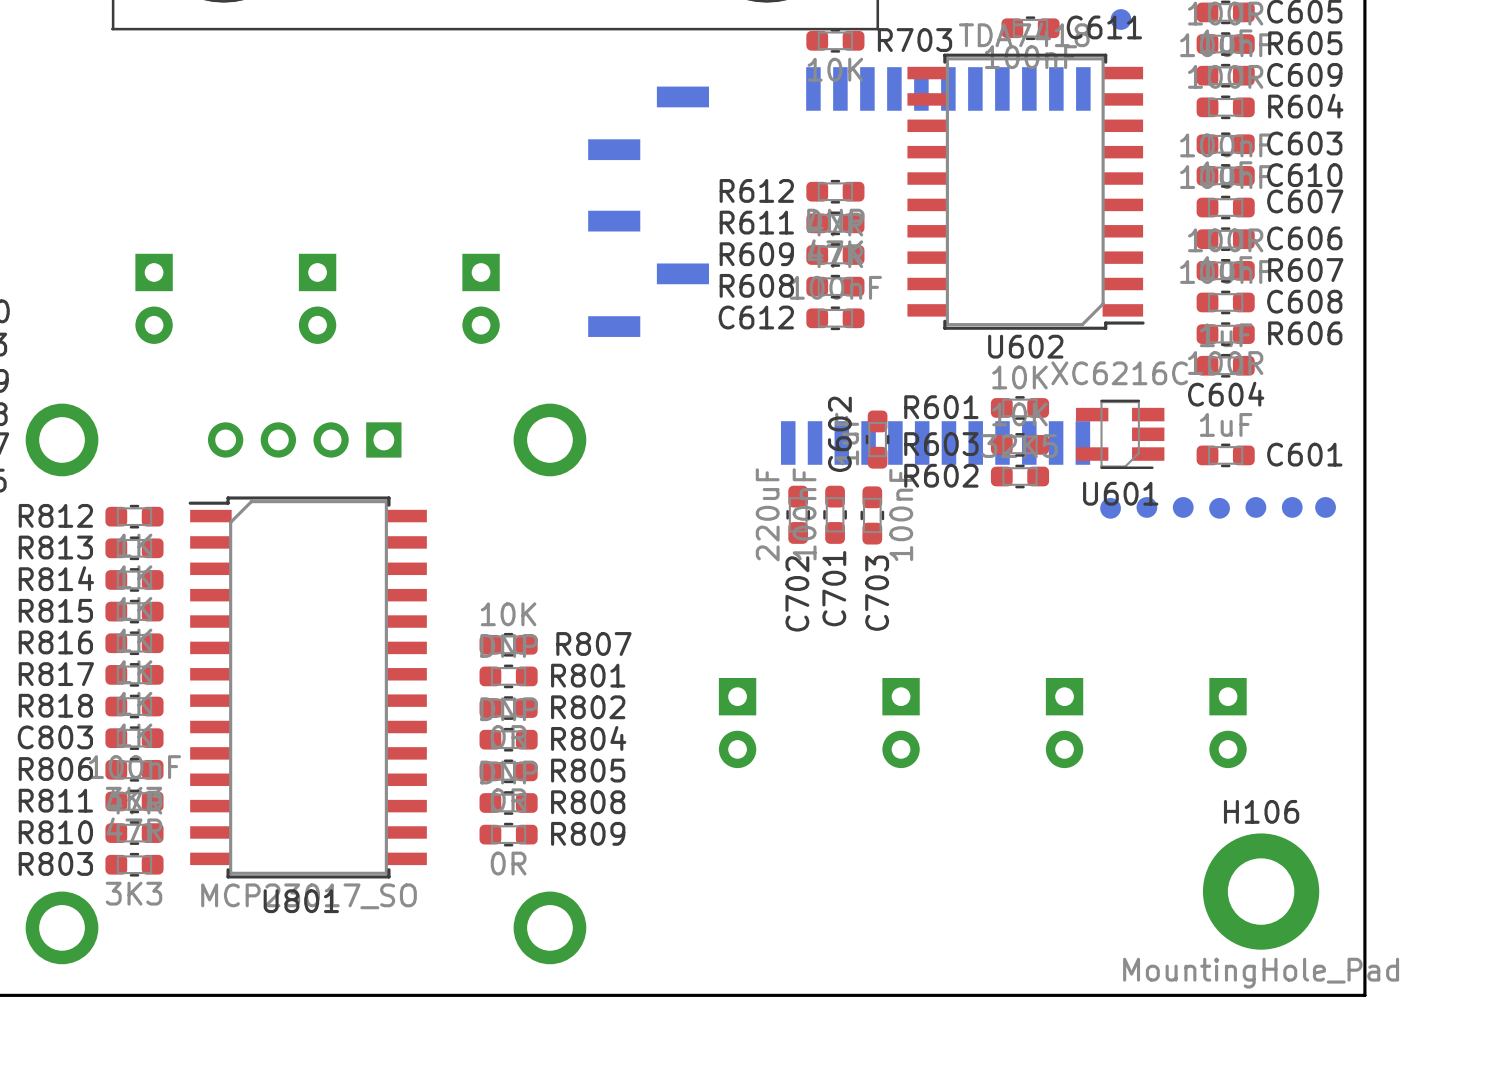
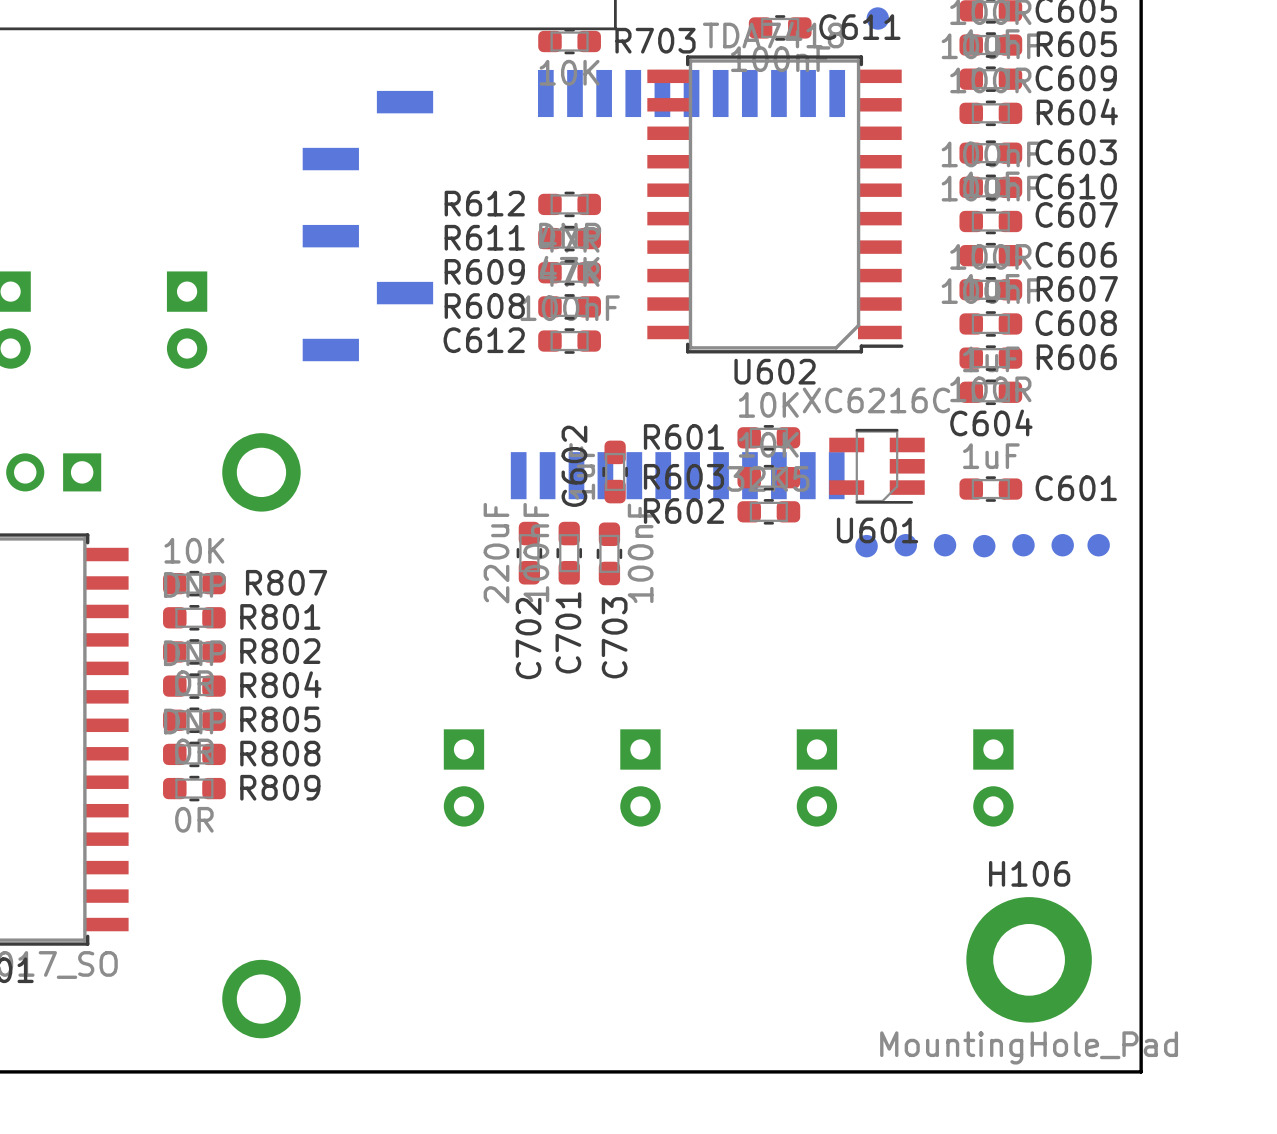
R807 position: (508, 644) -> (194, 583)
R801 position: (508, 676) -> (194, 617)
R802 position: (508, 708) -> (194, 651)
R804 position: (508, 739) -> (194, 686)
R805 position: (508, 771) -> (194, 720)
R808 position: (508, 802) -> (194, 754)
R809 position: (508, 834) -> (194, 788)

